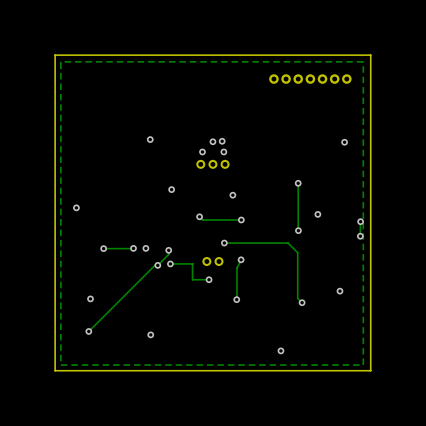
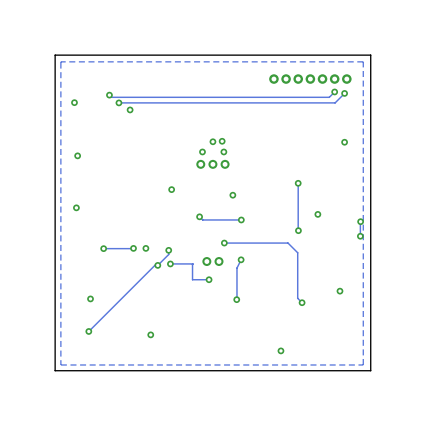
track: none -> (334, 91) (329, 97) (111, 97) (109, 95)
via: none -> (334, 91)
track: none -> (344, 93) (335, 102) (118, 102)
via: none -> (344, 93)
via: none -> (109, 95)
via: none -> (74, 102)
via: none -> (118, 102)
via: none -> (130, 109)
via: (150, 139) -> none
via: none -> (77, 155)

